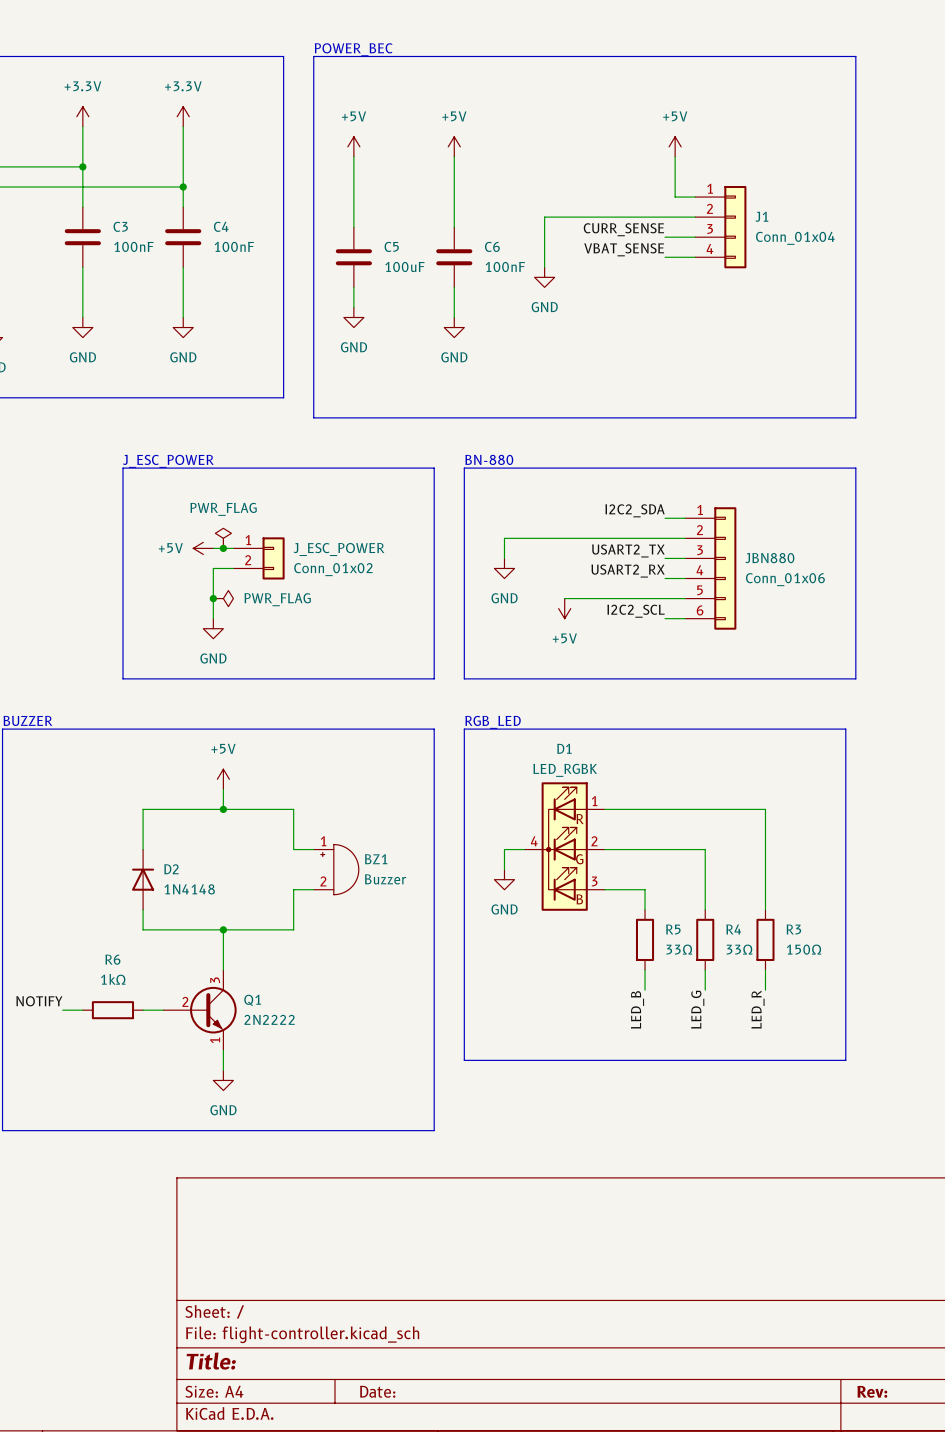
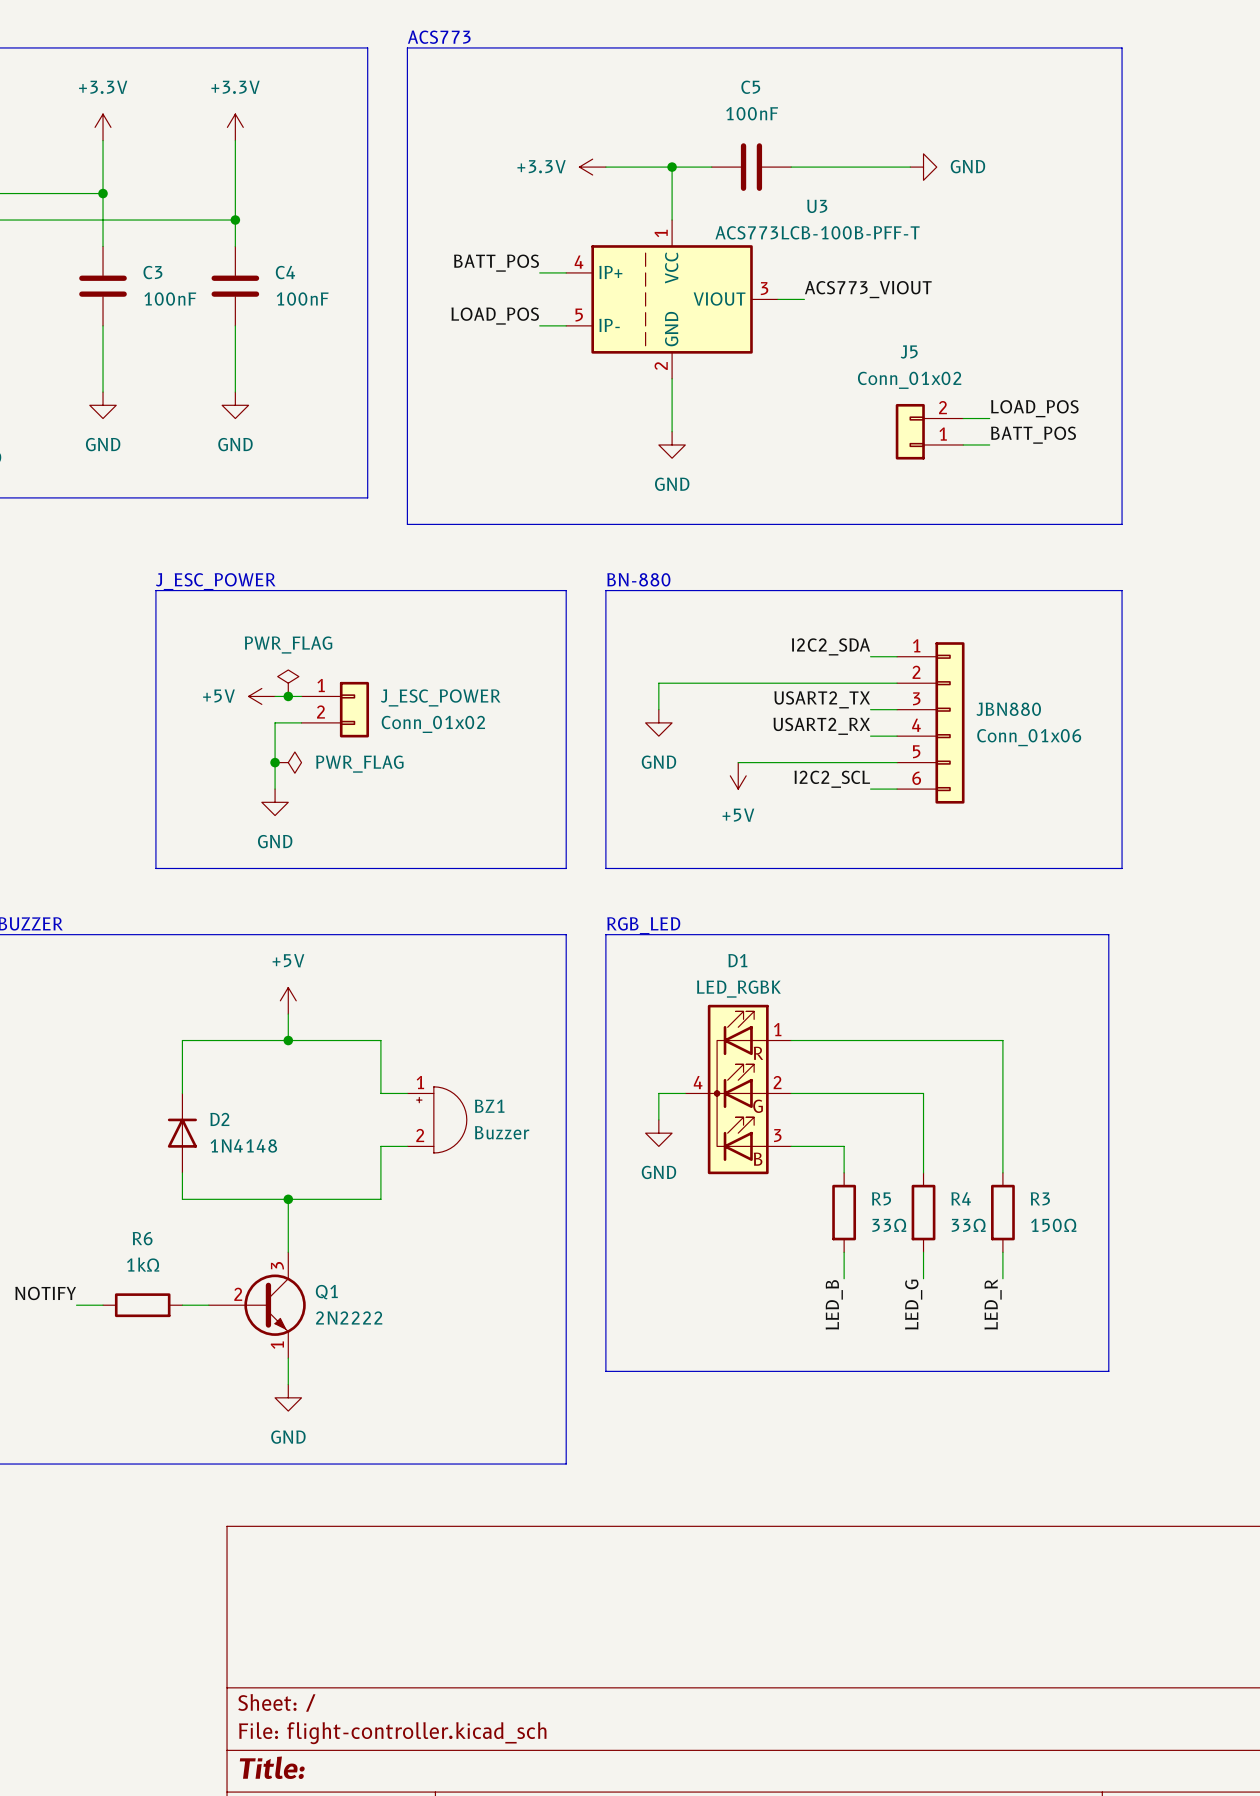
text: POWER_BEC (353, 49) -> ACS773 (439, 37)
power symbol: +5V (353, 146) -> none
power symbol: +5V (454, 146) -> +3.3V (592, 167)
wire: none -> (605, 167) (711, 167)
wire: none -> (672, 167) (672, 220)
junction: none -> (672, 167)
wire: none -> (791, 167) (910, 167)
power symbol: +5V (675, 146) -> none
power symbol: none -> GND (923, 167)
wire: (353, 156) (353, 227) -> none
wire: (454, 156) (454, 227) -> none
wire: (675, 156) (675, 197) (695, 197) -> none
wire: (695, 217) (544, 217) (544, 267) -> none
label: none -> BATT_POS (496, 263)
wire: none -> (539, 272) (566, 272)
J1: Conn_01x04 (720, 227) -> none
label: CURR_SENSE (623, 229) -> none
wire: (665, 237) (695, 237) -> none
label: none -> ACS773_VIOUT (868, 289)
C5 name position: C5 (391, 246) -> C5 (750, 87)
U3: none -> ACS773LCB-100B-PFF-T (672, 299)
wire: none -> (777, 299) (804, 299)
label: VBAT_SENSE (624, 249) -> none
C5 rotation: 0° (353, 257) -> 90° clockwise (751, 167)
C5 position: (353, 257) -> (751, 167)
C6: 100nF (454, 257) -> none
wire: (665, 257) (695, 257) -> none
label: none -> LOAD_POS (495, 316)
C5 value: 100uF (404, 266) -> 100nF (752, 113)
wire: none -> (539, 325) (566, 325)
power symbol: GND (544, 277) -> none
wire: (353, 287) (353, 307) -> none
wire: (454, 287) (454, 317) -> none
wire: none -> (672, 378) (672, 431)
power symbol: GND (353, 317) -> none
power symbol: GND (454, 327) -> none
label: none -> LOAD_POS (1034, 408)
wire: none -> (963, 418) (989, 418)
J5: none -> Conn_01x02 (929, 431)
label: none -> BATT_POS (1033, 435)
power symbol: none -> GND (672, 444)
wire: none -> (963, 444) (989, 444)

